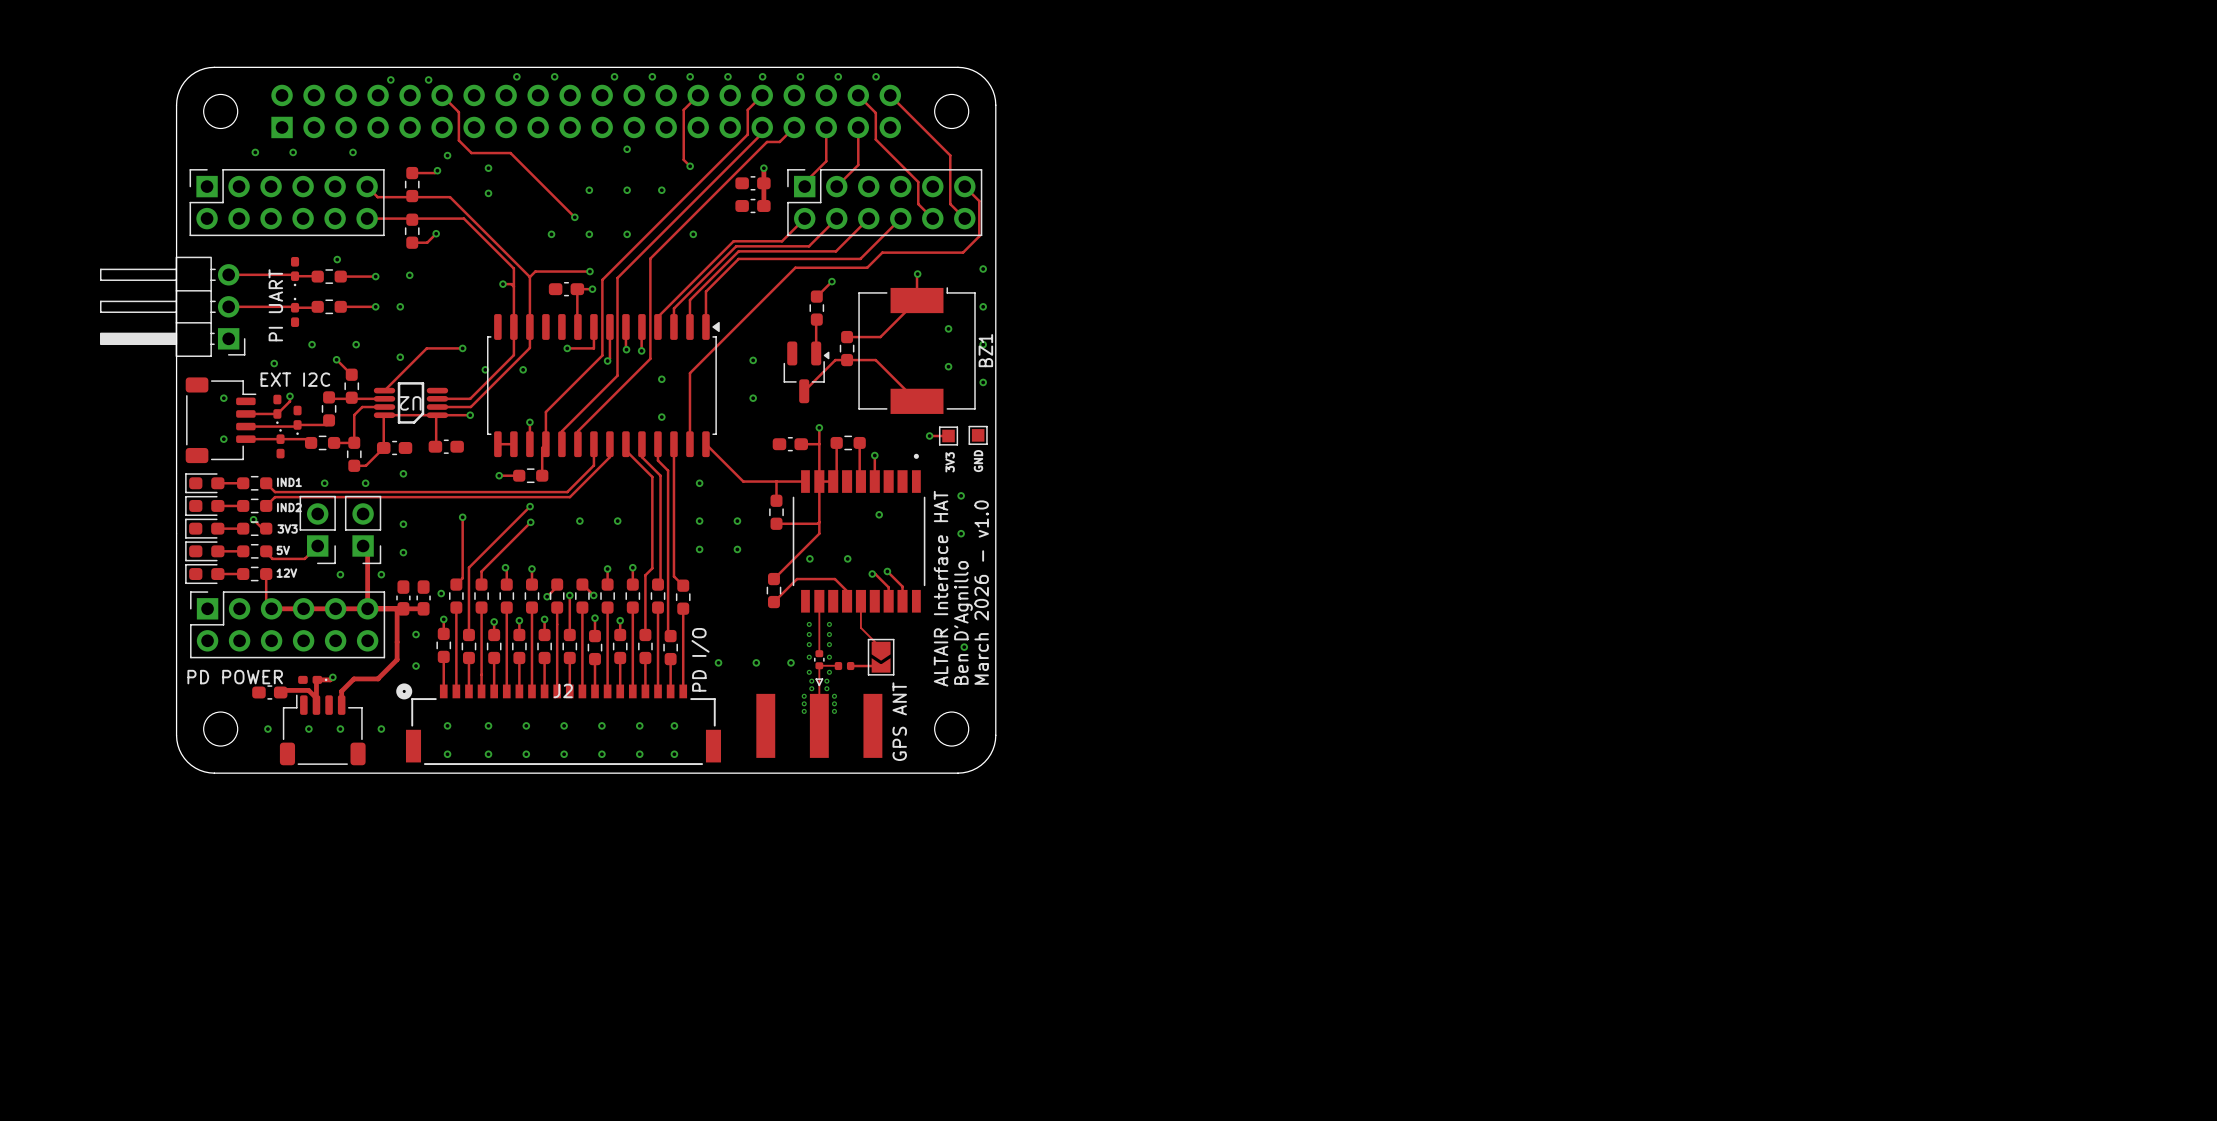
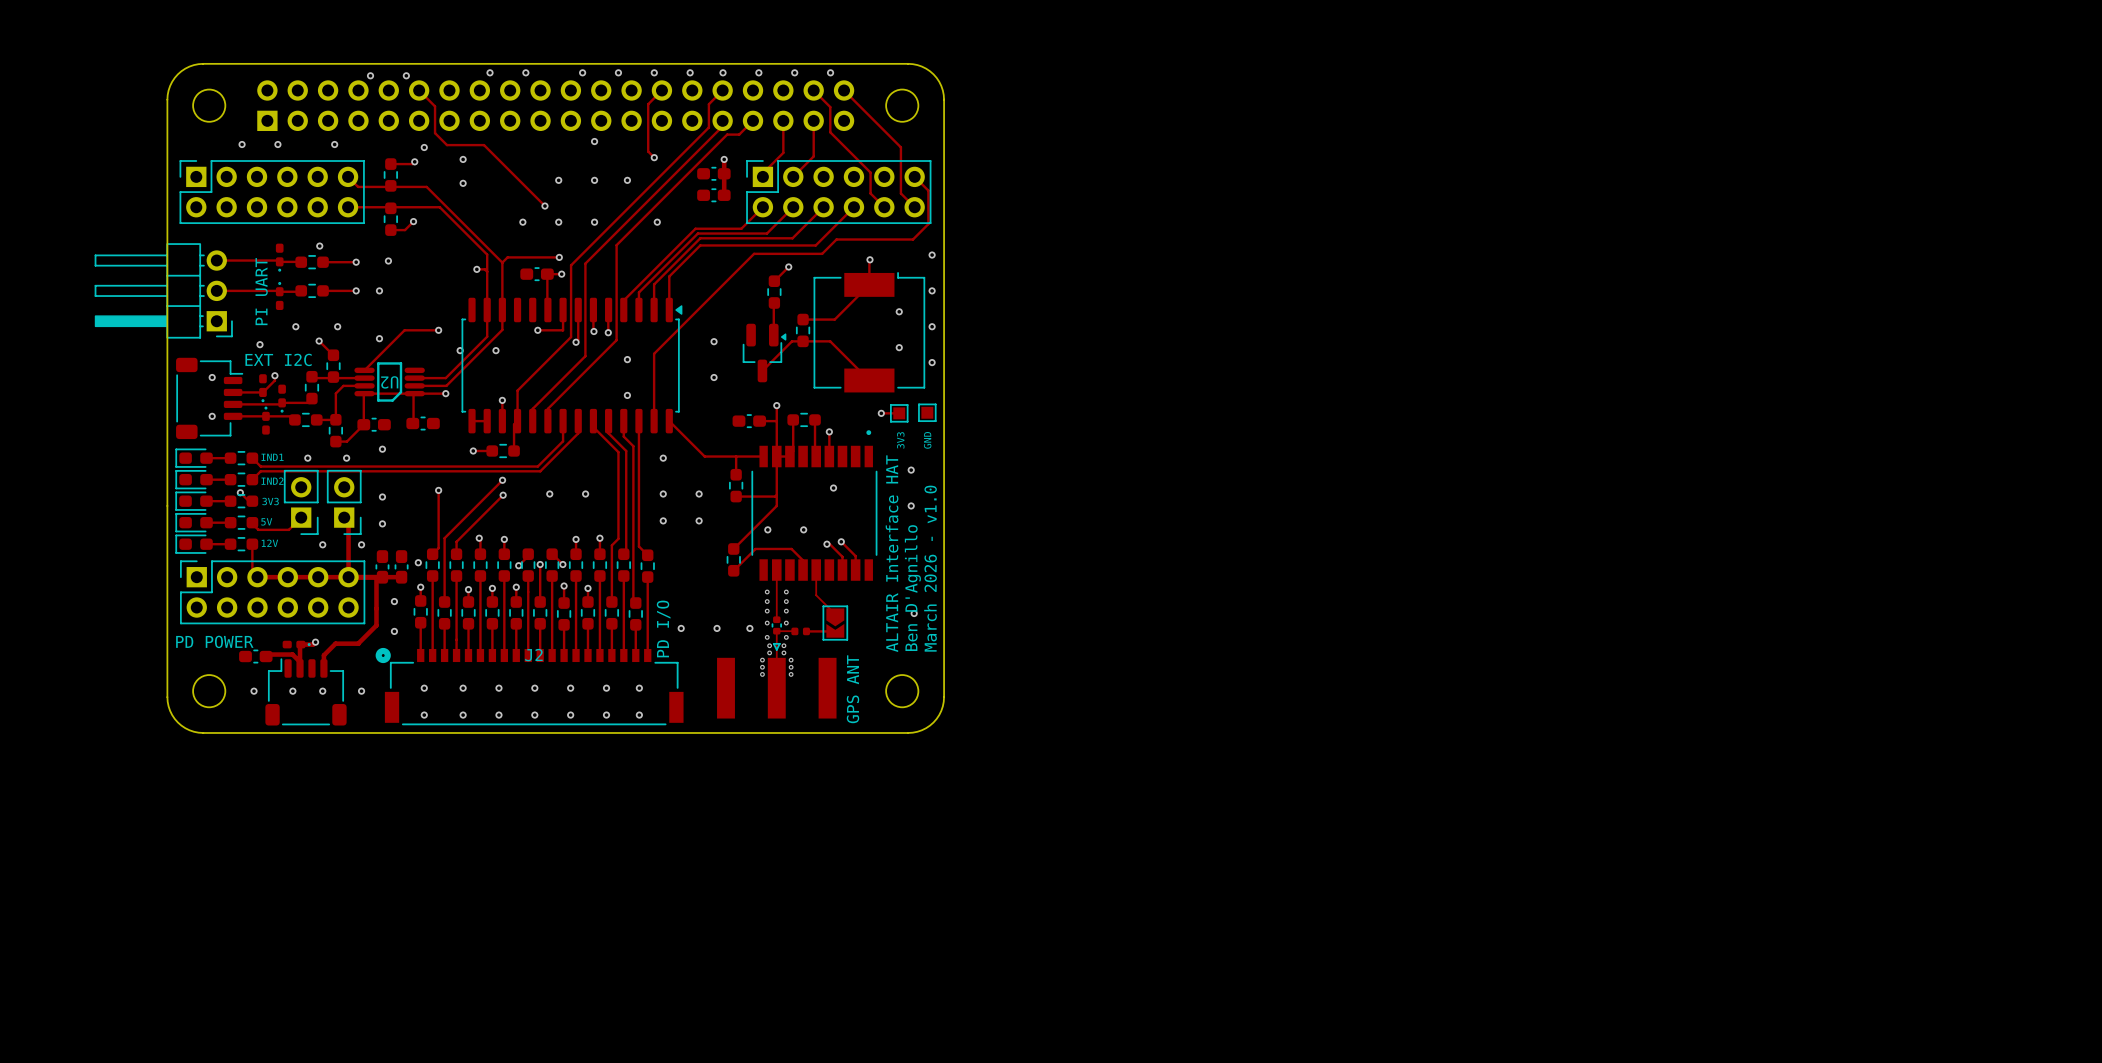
BZ1 name: BZ1 (985, 350) -> none

